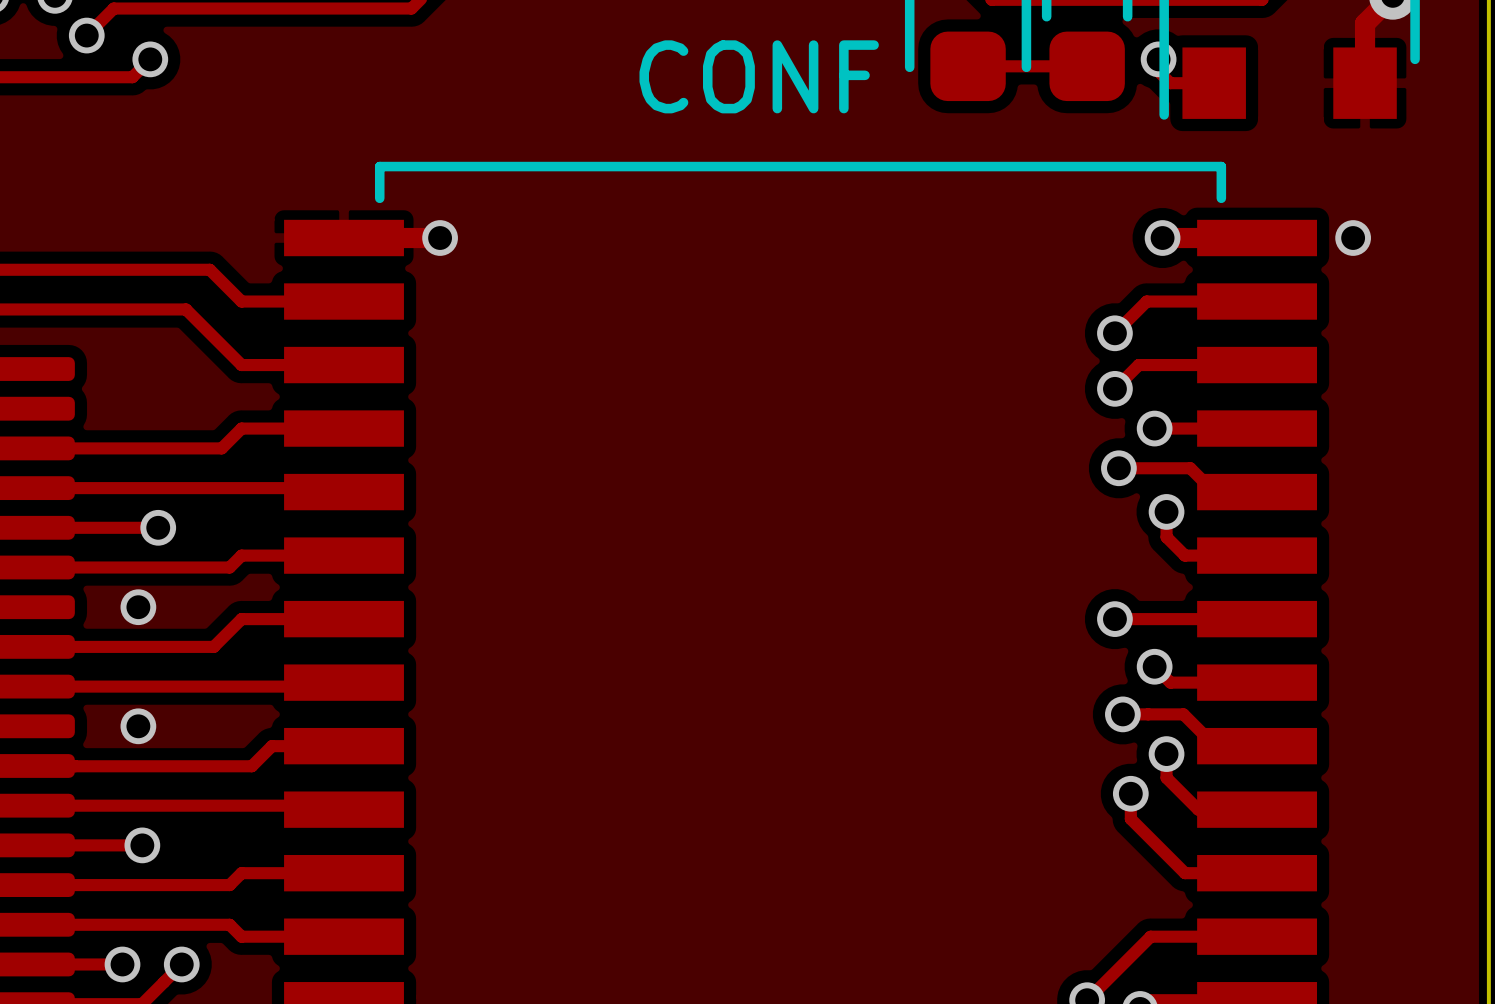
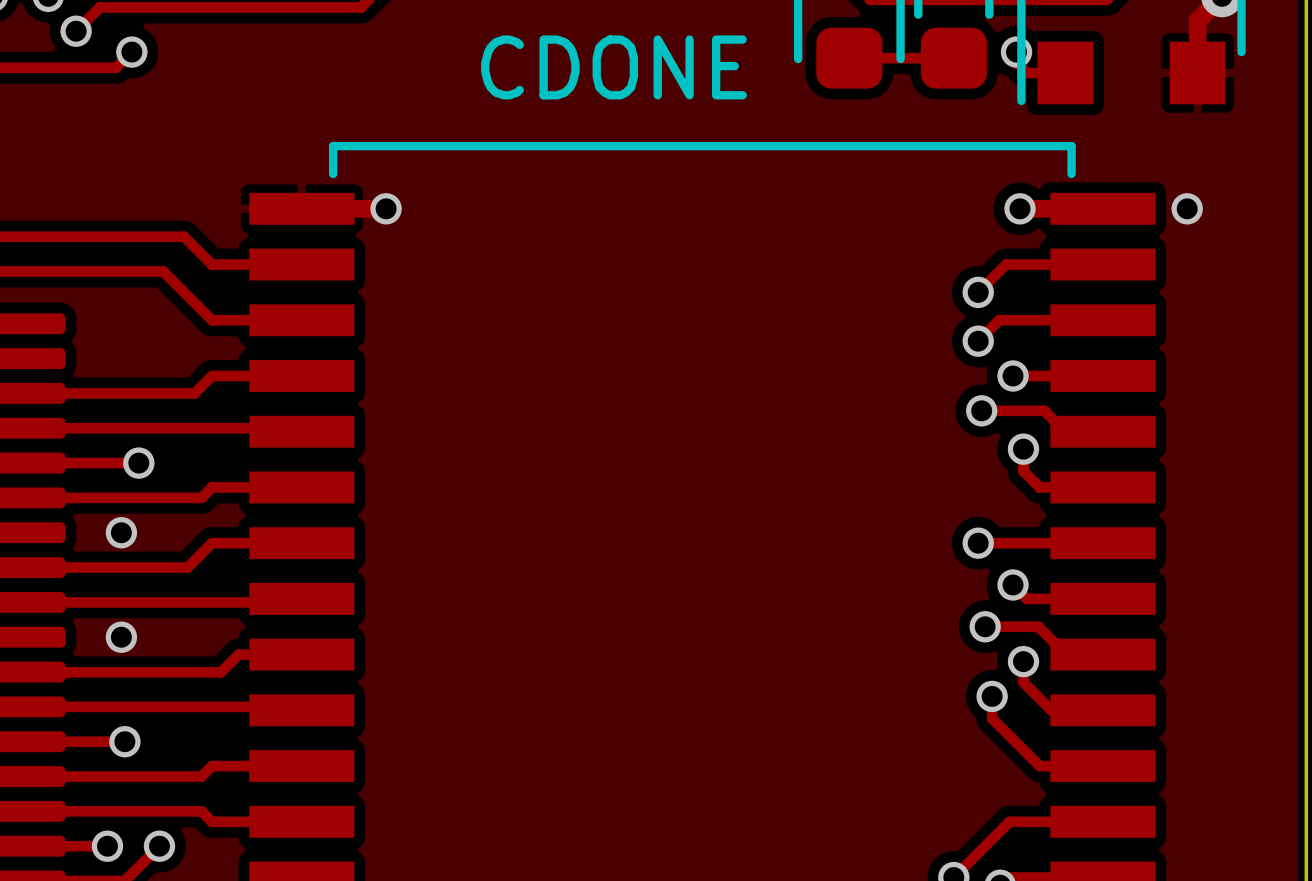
text: CONF (759, 76) -> CDONE (613, 67)

